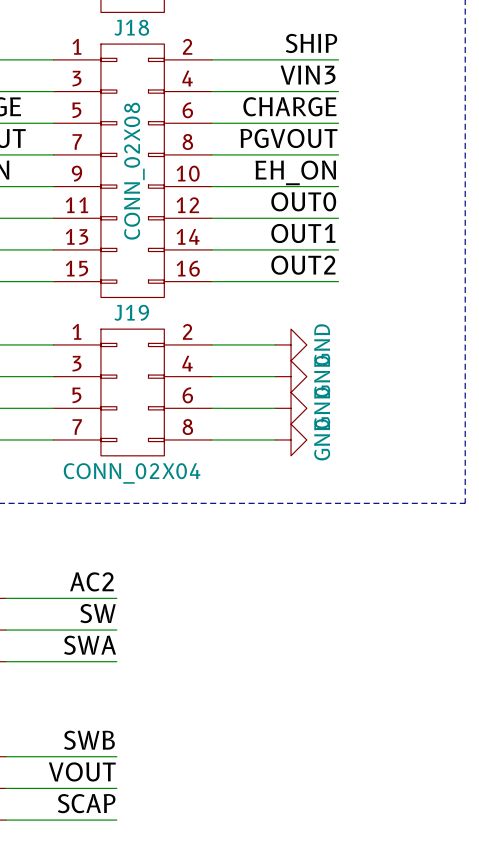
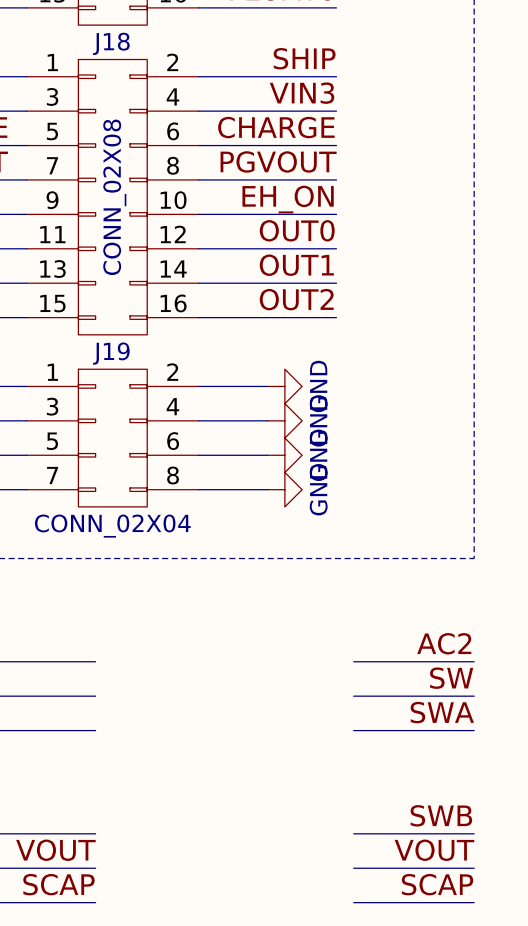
label: AC2 (91, 581) -> none
label: none -> AC2 (444, 643)
wire: none -> (353, 661) (474, 661)
label: SW (98, 613) -> none
label: none -> SW (451, 678)
wire: none -> (353, 696) (474, 696)
label: SWA (90, 645) -> none
label: none -> SWA (442, 712)
wire: none -> (353, 730) (474, 730)
label: SWB (89, 740) -> none
label: none -> SWB (441, 815)
wire: none -> (353, 833) (474, 833)
label: none -> VOUT (434, 850)
wire: none -> (353, 868) (474, 868)
label: none -> SCAP (437, 884)
wire: none -> (353, 902) (474, 902)

